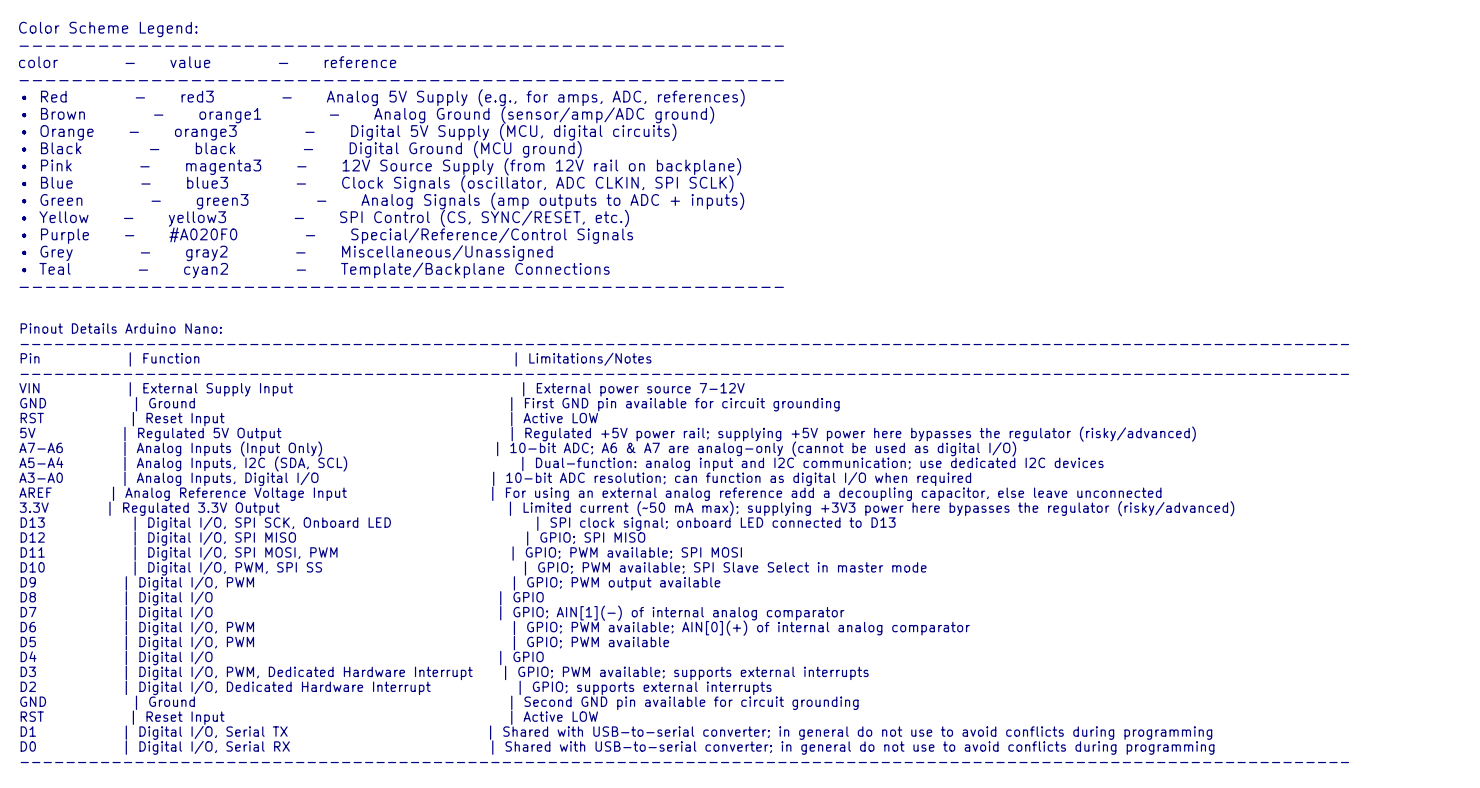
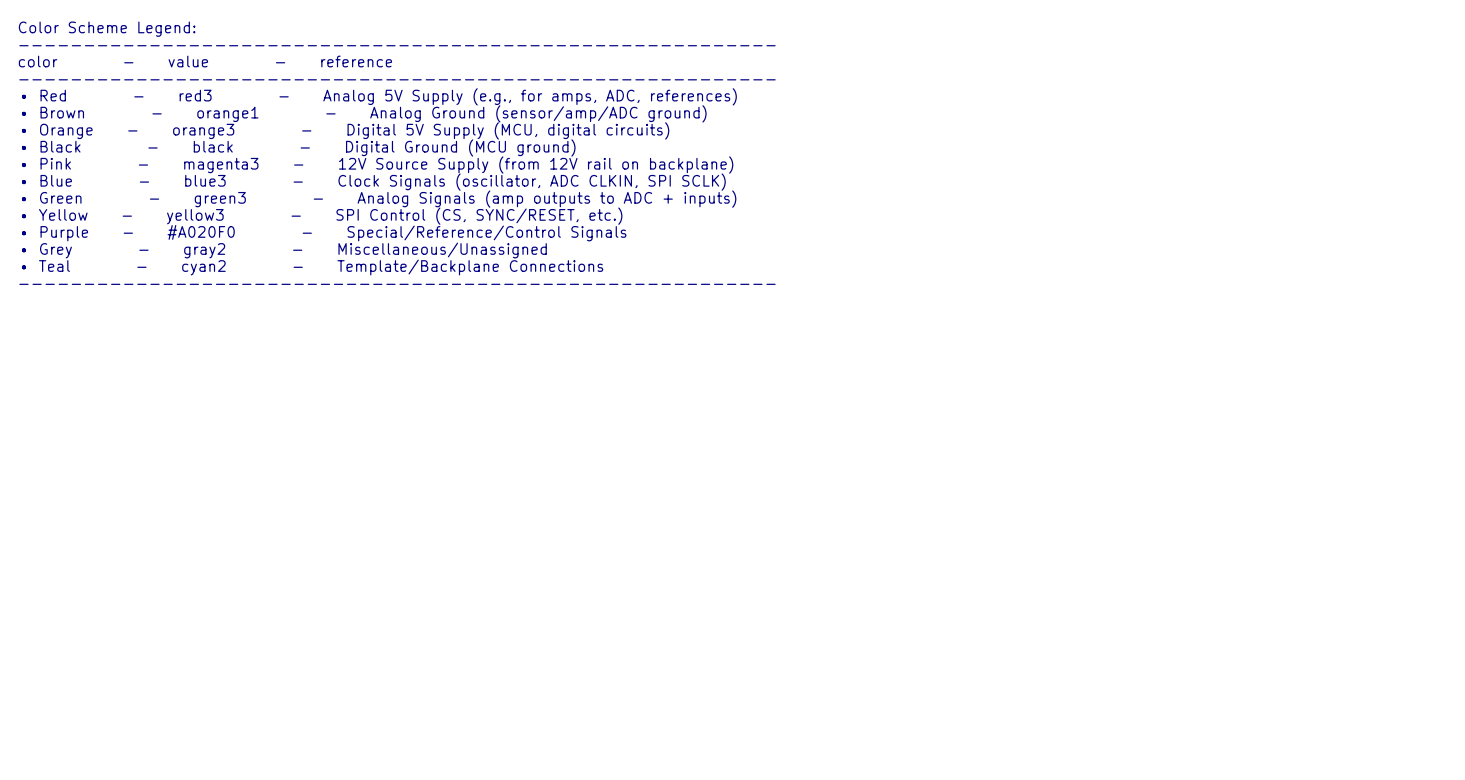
text: Pinout Details Arduino Nano: (121, 328) -> none
text: -------------------------------------------------------------------------------------------------------------------- (684, 344) -> none
text: Pin | Function | Limitations/Notes (336, 359) -> none
text: -------------------------------------------------------------------------------------------------------------------- (684, 374) -> none
text: VIN | External Supply Input | External power source 7-12V (381, 389) -> none
text: GND | Ground | First GND pin available for circuit grounding (429, 404) -> none
text: RST | Reset Input | Active LOW (309, 419) -> none
text: 5V | Regulated 5V Output | Regulated +5V power rail; supplying +5V power here bypasses the regulator (risky/advanced) (608, 434) -> none
text: A7-A6 | Analog Inputs (Input Only) | 10-bit ADC; A6 & A7 are analog-only (cannot be used as digital I/O) (517, 449) -> none
text: A5-A4 | Analog Inputs, I2C (SDA, SCL) | Dual-function: analog input and I2C communication; use dedicated I2C devices (561, 463) -> none
text: A3-A0 | Analog Inputs, Digital I/O | 10-bit ADC resolution; can function as digital I/O when required (495, 478) -> none
text: AREF | Analog Reference Voltage Input | For using an external analog reference add a decoupling capacitor, else leave unconnected (590, 493) -> none
text: 3.3V | Regulated 3.3V Output | Limited current (~50 mA max); supplying +3V3 power here bypasses the regulator (risky/advanced) (627, 508) -> none
text: D13 | Digital I/O, SPI SCK, Onboard LED | SPI clock signal; onboard LED connected to D13 (458, 523) -> none
text: D12 | Digital I/O, SPI MISO | GPIO; SPI MISO (332, 538) -> none
text: D11 | Digital I/O, SPI MOSI, PWM | GPIO; PWM available; SPI MOSI (381, 553) -> none
text: D10 | Digital I/O, PWM, SPI SS | GPIO; PWM available; SPI Slave Select in master mode (473, 568) -> none
text: D9 | Digital I/O, PWM | GPIO; PWM output available (370, 583) -> none
text: D8 | Digital I/O | GPIO (282, 598) -> none
text: D7 | Digital I/O | GPIO; AIN[1](-) of internal analog comparator (432, 613) -> none
text: D6 | Digital I/O, PWM | GPIO; PWM available; AIN[0](+) of internal analog comparator (495, 628) -> none
text: D5 | Digital I/O, PWM | GPIO; PWM available (344, 643) -> none
text: D4 | Digital I/O | GPIO (282, 658) -> none
text: D3 | Digital I/O, PWM, Dedicated Hardware Interrupt | GPIO; PWM available; supports external interrupts (444, 672) -> none
text: D2 | Digital I/O, Dedicated Hardware Interrupt | GPIO; supports external interrupts (396, 687) -> none
text: GND | Ground | Second GND pin available for circuit grounding (439, 702) -> none
text: RST | Reset Input | Active LOW (309, 717) -> none
text: D1 | Digital I/O, Serial TX | Shared with USB-to-serial converter; in general do not use to avoid conflicts during programming (616, 732) -> none
text: D0 | Digital I/O, Serial RX | Shared with USB-to-serial converter; in general do not use to avoid conflicts during programming (617, 747) -> none
text: -------------------------------------------------------------------------------------------------------------------- (684, 762) -> none

